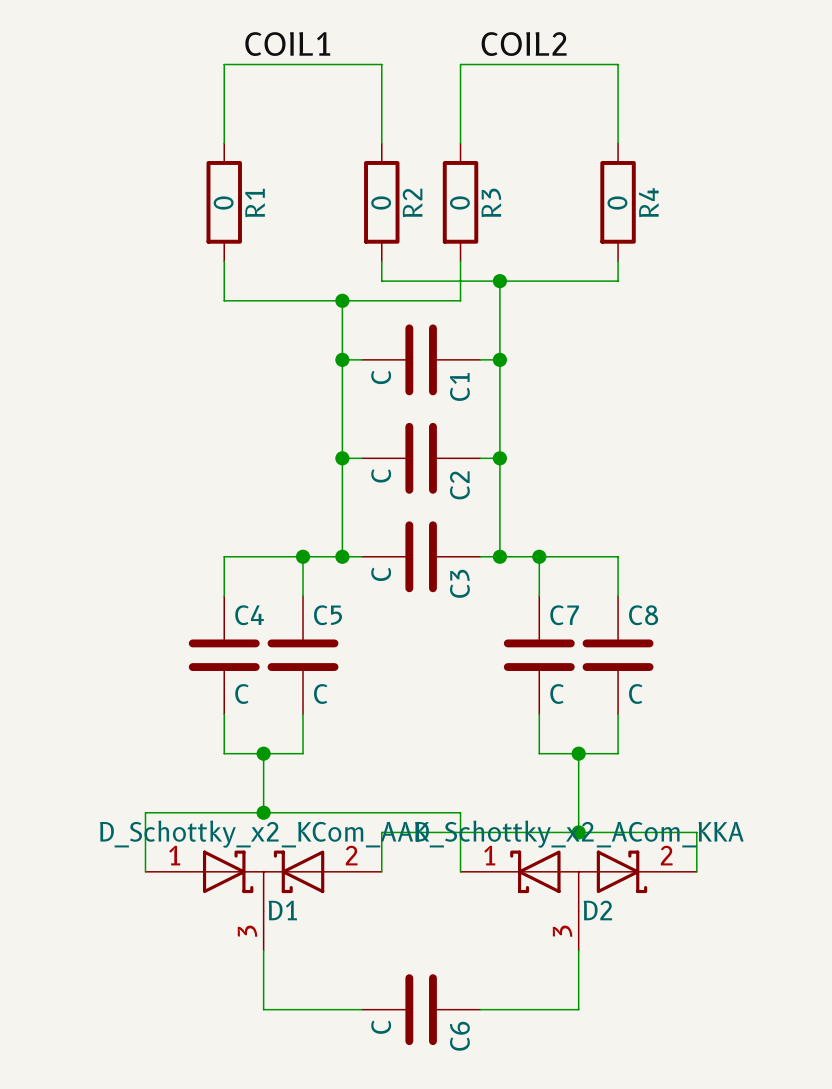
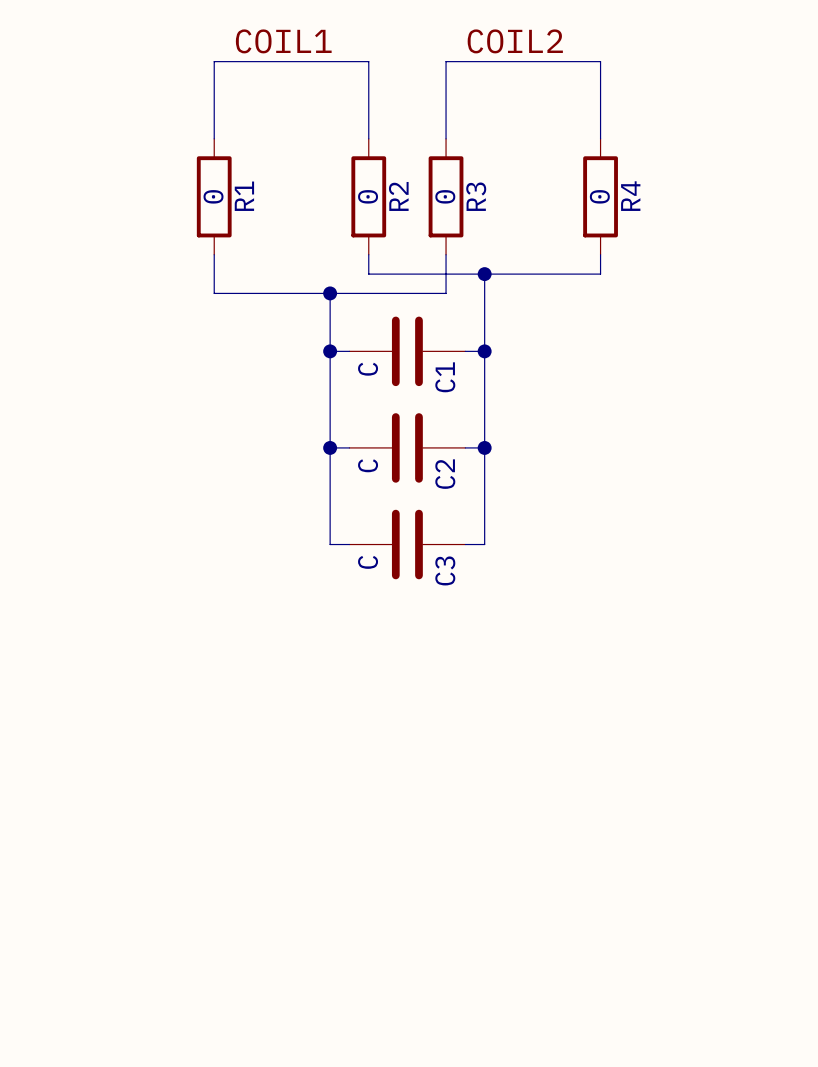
wire: (303, 556) (303, 596) -> none
junction: (303, 556) -> none
wire: (342, 556) (224, 556) (224, 596) -> none
junction: (342, 556) -> none
wire: (499, 556) (618, 556) (618, 596) -> none
junction: (499, 556) -> none
wire: (539, 556) (539, 596) -> none
junction: (539, 556) -> none
C4: C (224, 655) -> none
C5: C (303, 655) -> none
C7: C (539, 655) -> none
C8: C (618, 655) -> none
wire: (224, 714) (224, 753) (303, 753) (303, 714) -> none
wire: (539, 714) (539, 753) (618, 753) (618, 714) -> none
wire: (263, 753) (263, 812) -> none
junction: (263, 753) -> none
wire: (578, 753) (578, 832) -> none
junction: (578, 753) -> none
junction: (263, 812) -> none
junction: (578, 832) -> none
wire: (145, 871) (145, 812) (460, 812) (460, 871) -> none
wire: (381, 871) (381, 832) (696, 832) (696, 871) -> none
D1: D_Schottky_x2_KCom_AAK (263, 900) -> none
D2: D_Schottky_x2_ACom_KKA (578, 900) -> none
wire: (263, 950) (263, 1009) (362, 1009) -> none
wire: (578, 950) (578, 1009) (480, 1009) -> none
C6: C (421, 1009) -> none

